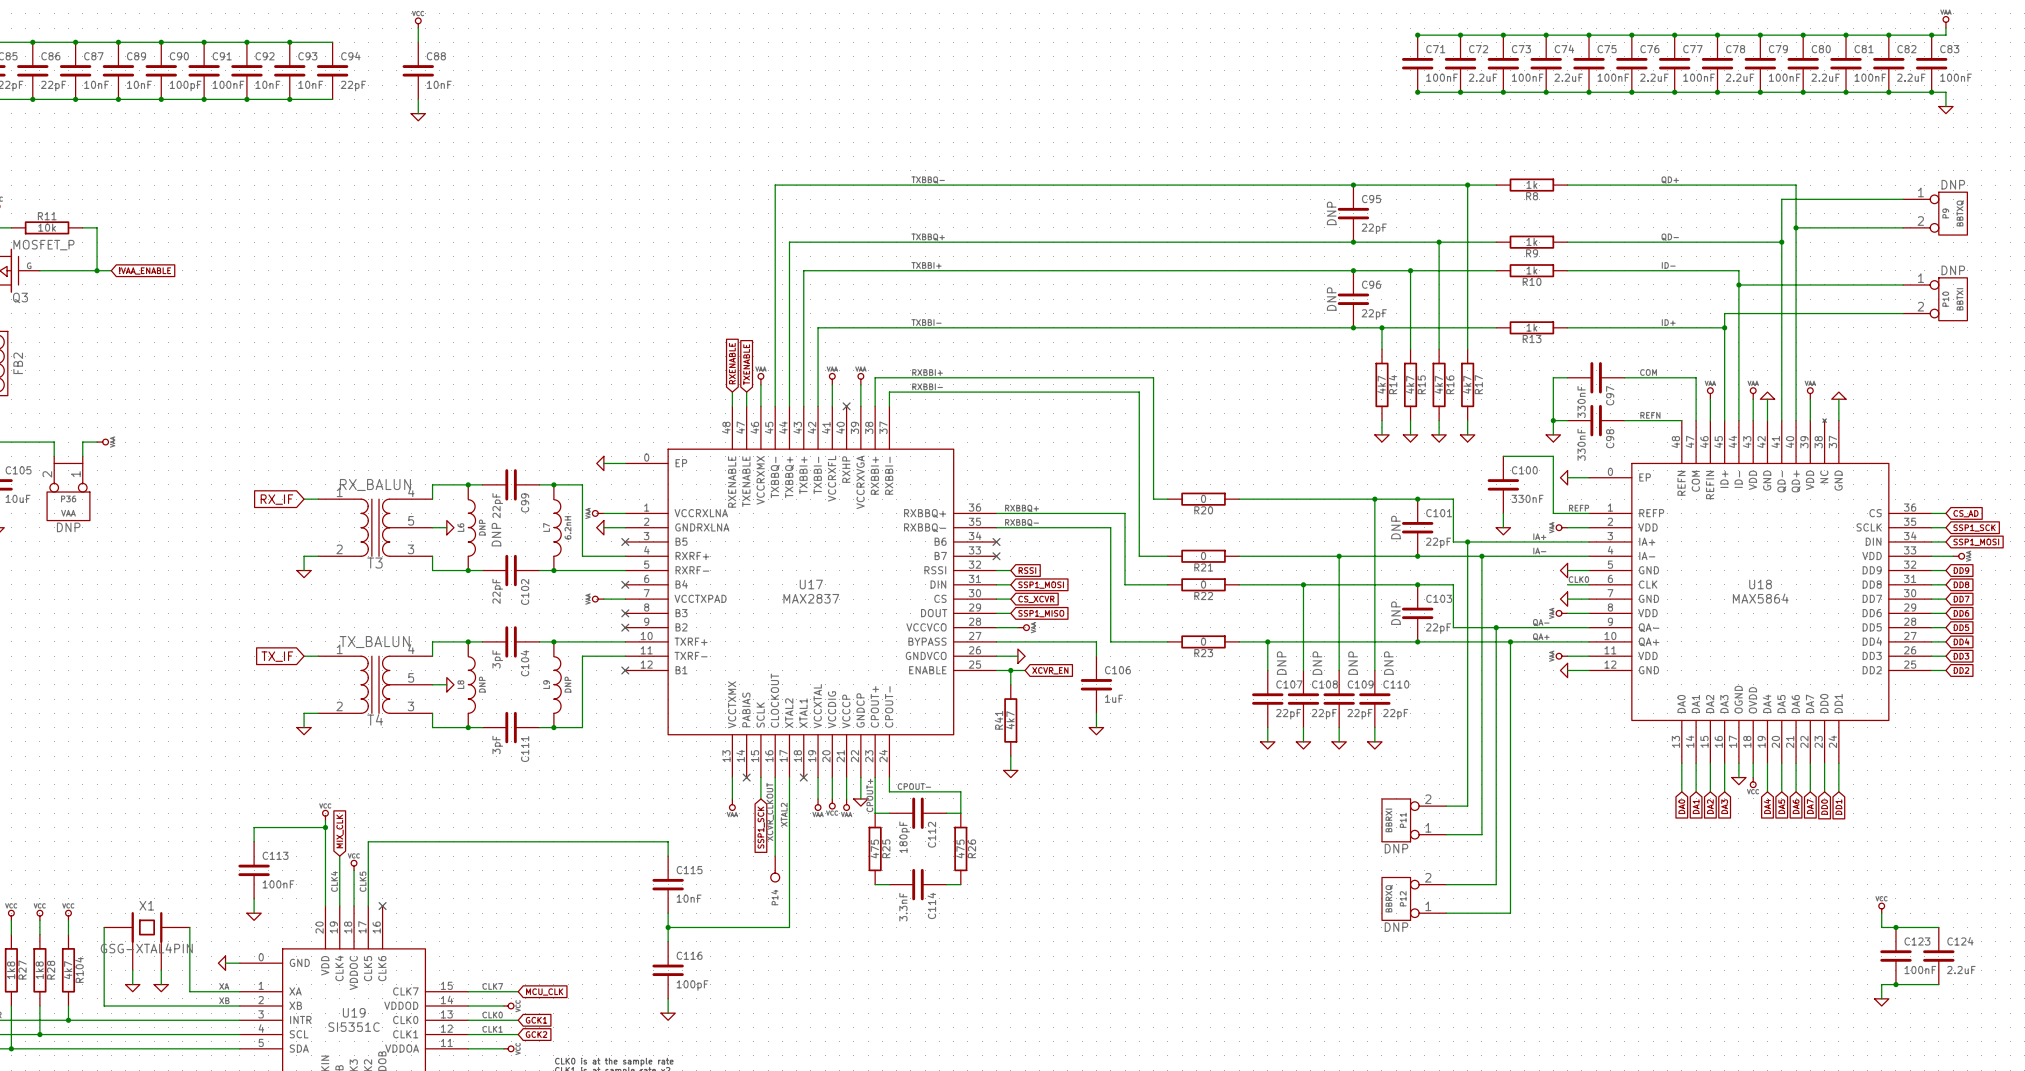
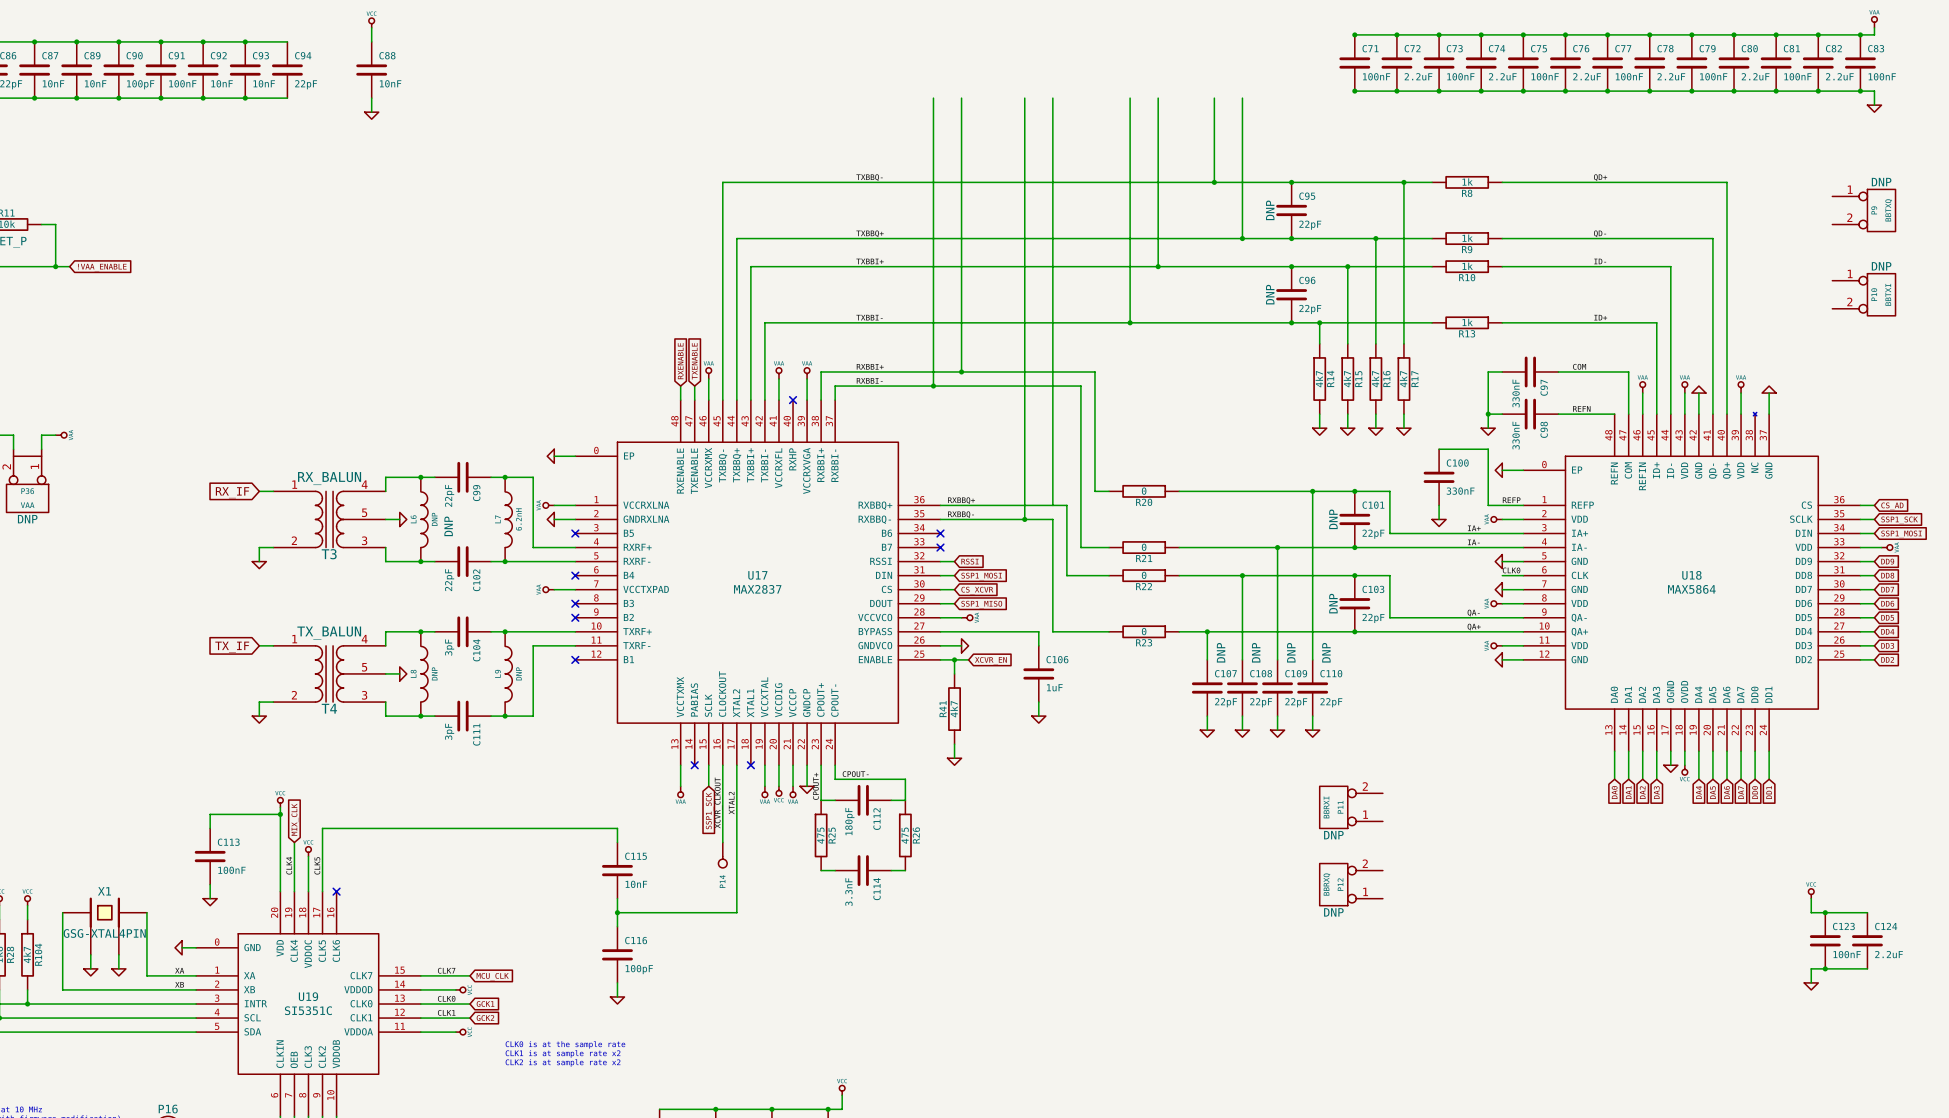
wire: none -> (933, 98) (933, 386)
wire: none -> (961, 98) (961, 371)
wire: none -> (1024, 98) (1024, 519)
wire: none -> (1052, 98) (1052, 505)
wire: none -> (1130, 98) (1130, 322)
wire: none -> (1158, 98) (1158, 266)
wire: none -> (1214, 98) (1214, 182)
wire: none -> (1242, 98) (1242, 238)
junction: none -> (1214, 182)
wire: (1903, 199) (1781, 199) (1781, 242) -> none
wire: (1796, 227) (1903, 227) -> none
junction: (1796, 227) -> none
junction: none -> (1242, 238)
junction: (1781, 242) -> none
junction: none -> (1158, 266)
wire: (1738, 284) (1903, 284) -> none
junction: (1738, 284) -> none
wire: (1903, 313) (1724, 313) (1724, 327) -> none
junction: none -> (1130, 322)
junction: (1724, 327) -> none
junction: none -> (961, 371)
junction: none -> (933, 386)
junction: none -> (1024, 519)
wire: (1467, 541) (1467, 806) (1446, 806) -> none
junction: (1467, 541) -> none
wire: (1481, 556) (1481, 834) (1446, 834) -> none
junction: (1481, 556) -> none
wire: (1496, 627) (1496, 884) (1446, 884) -> none
junction: (1496, 627) -> none
wire: (1510, 641) (1510, 913) (1446, 913) -> none
junction: (1510, 641) -> none

